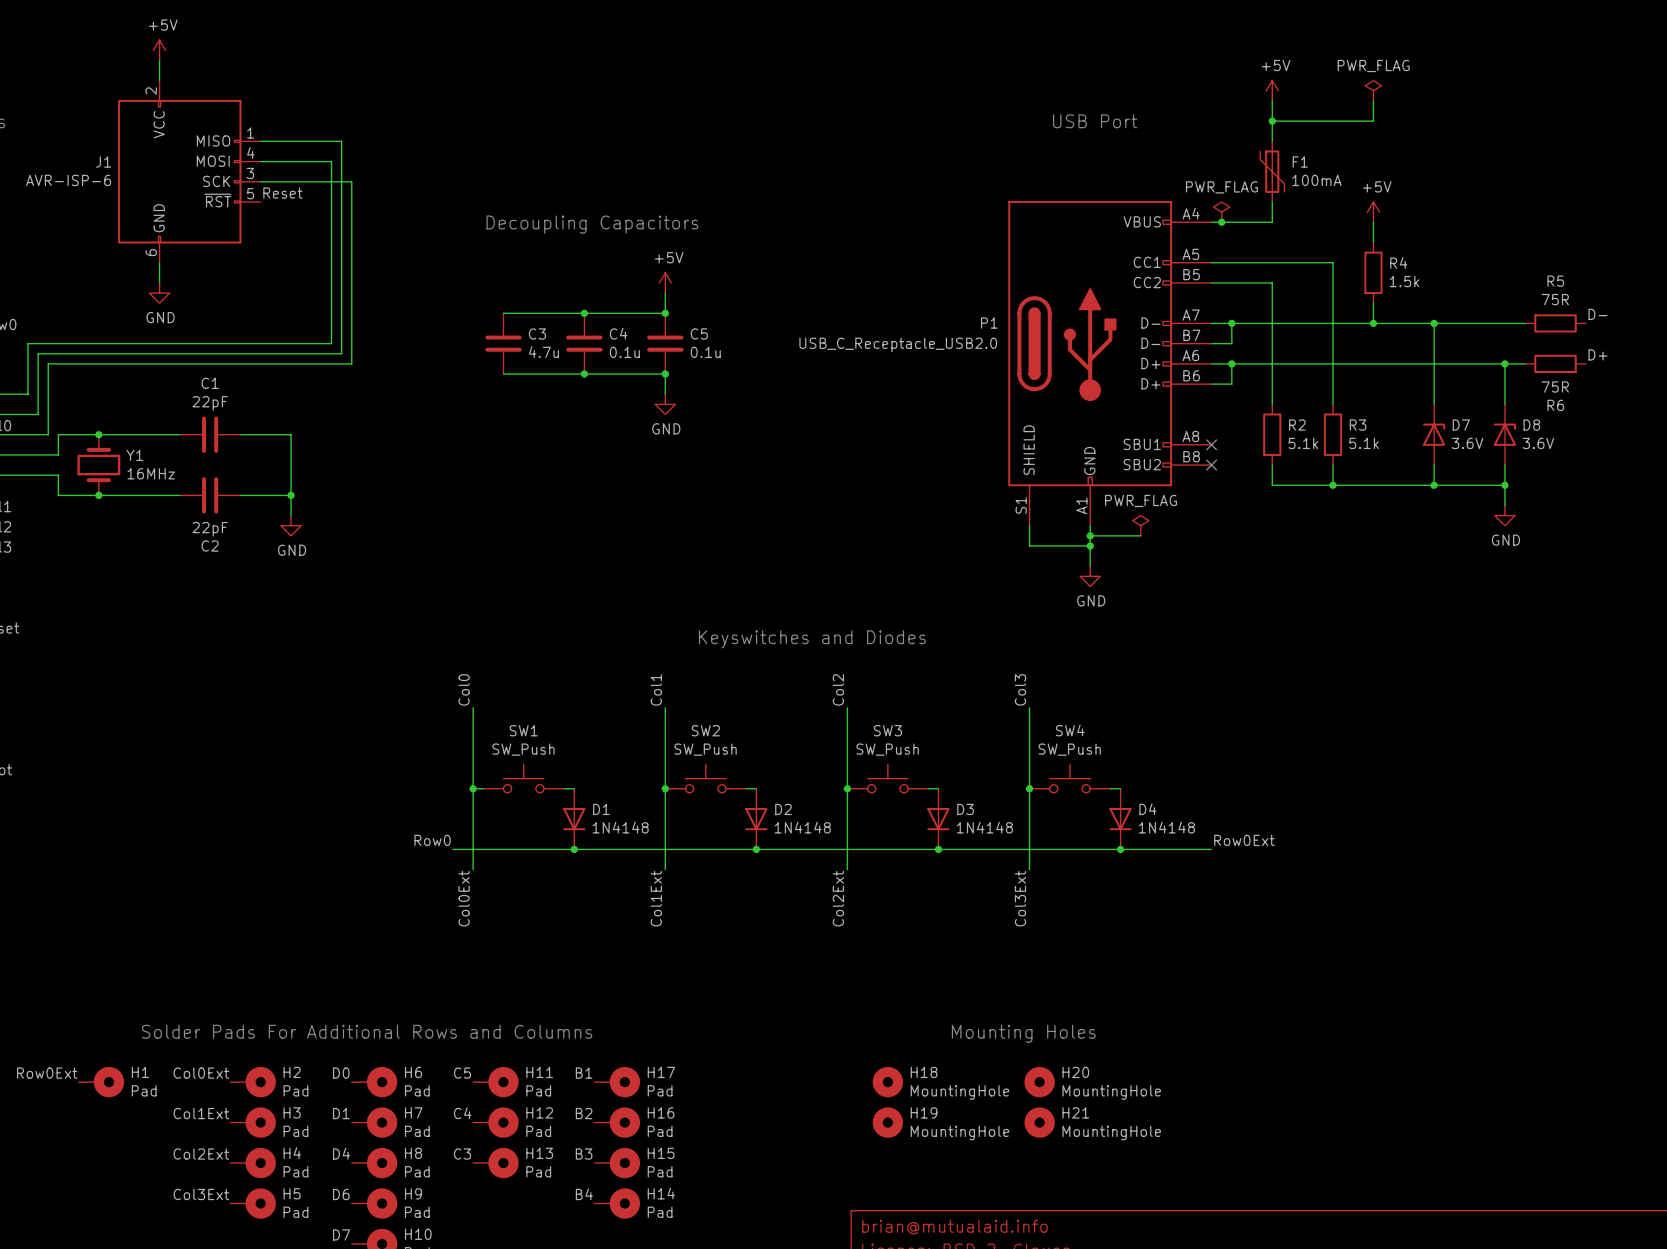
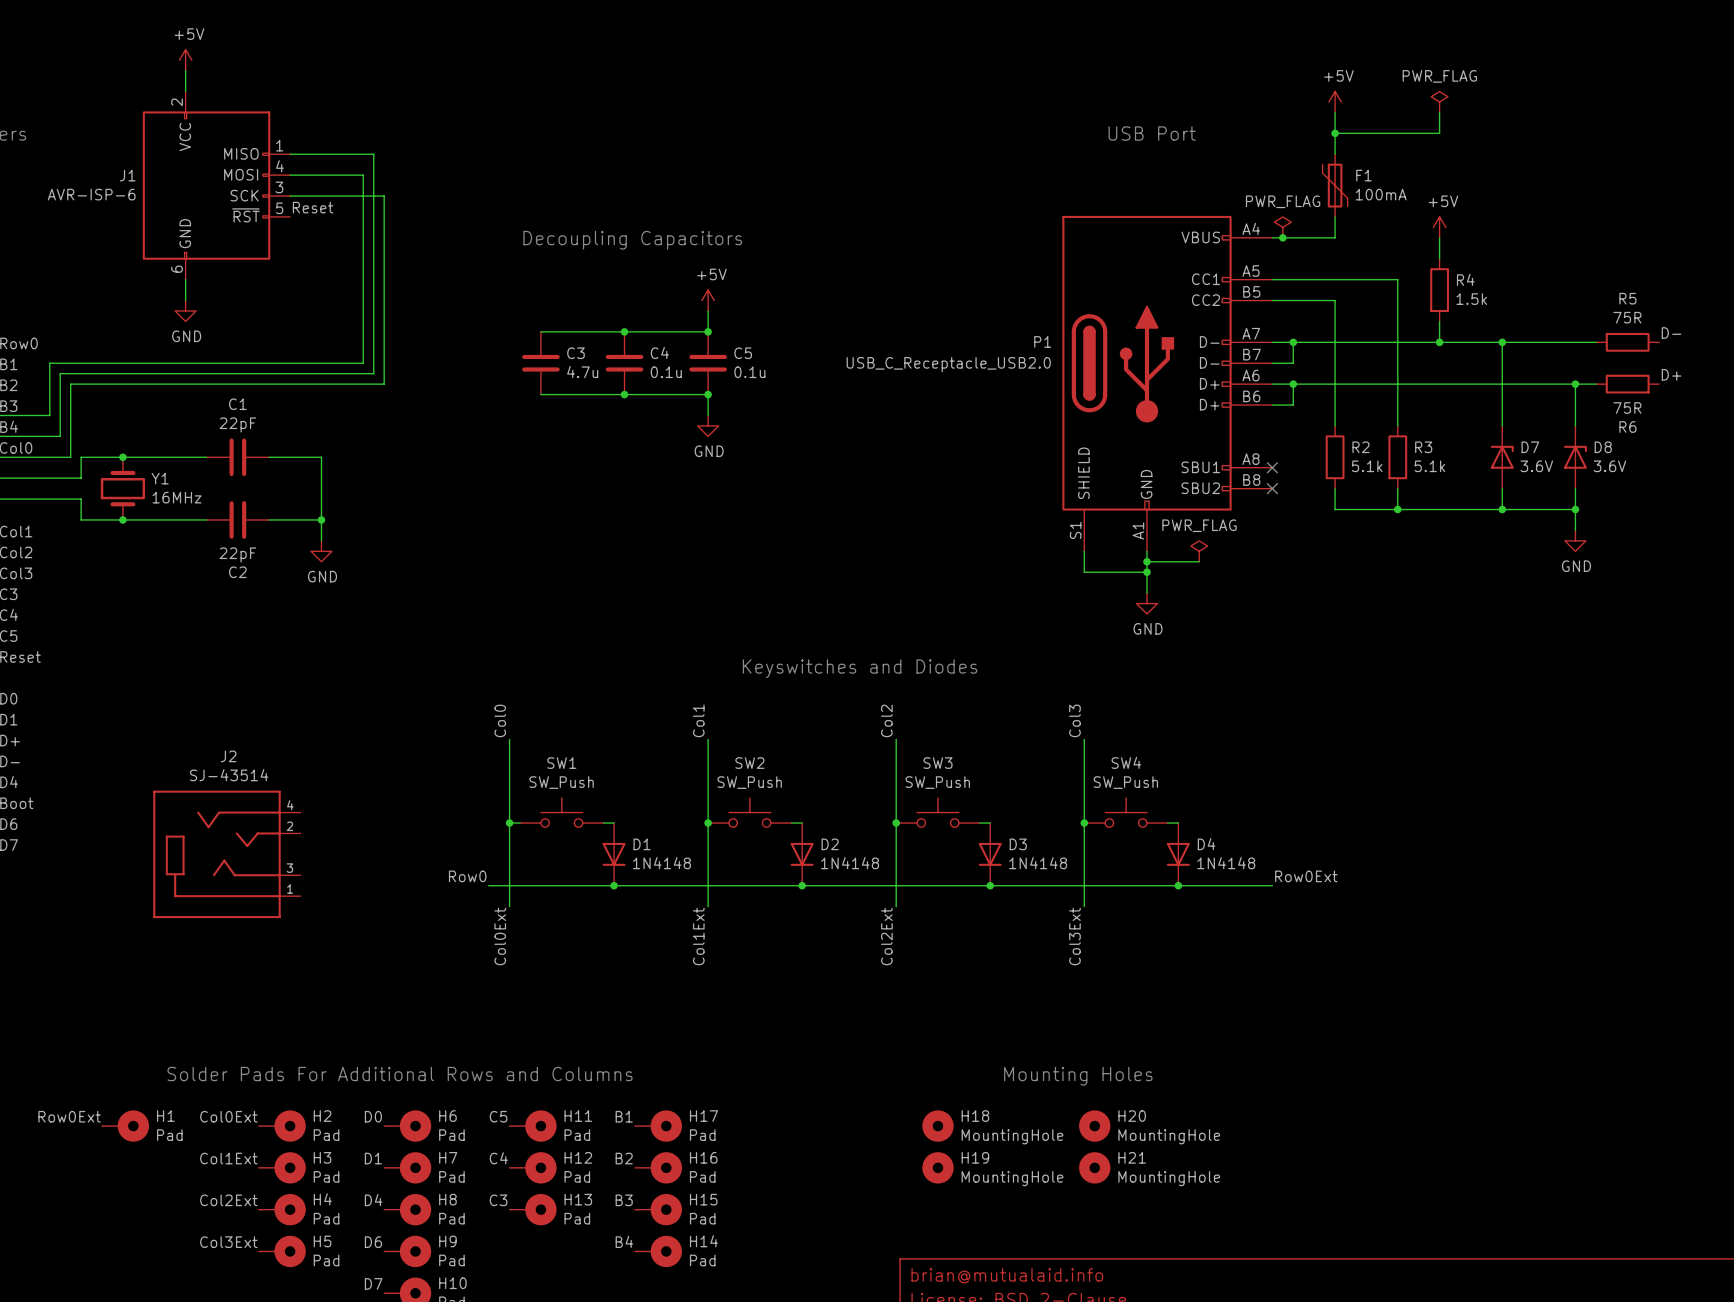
J2: none -> SJ-43514 (226, 854)

